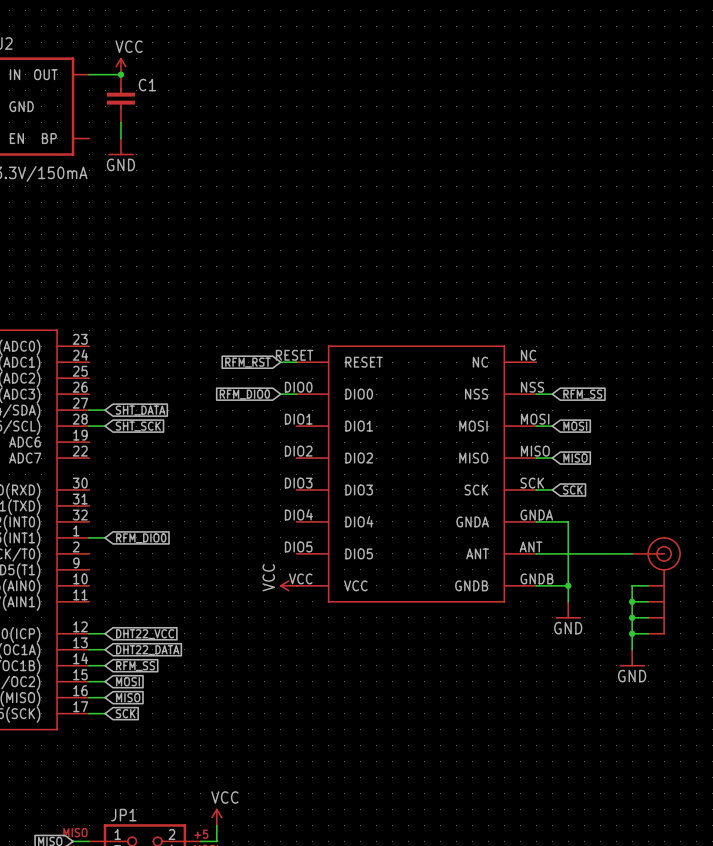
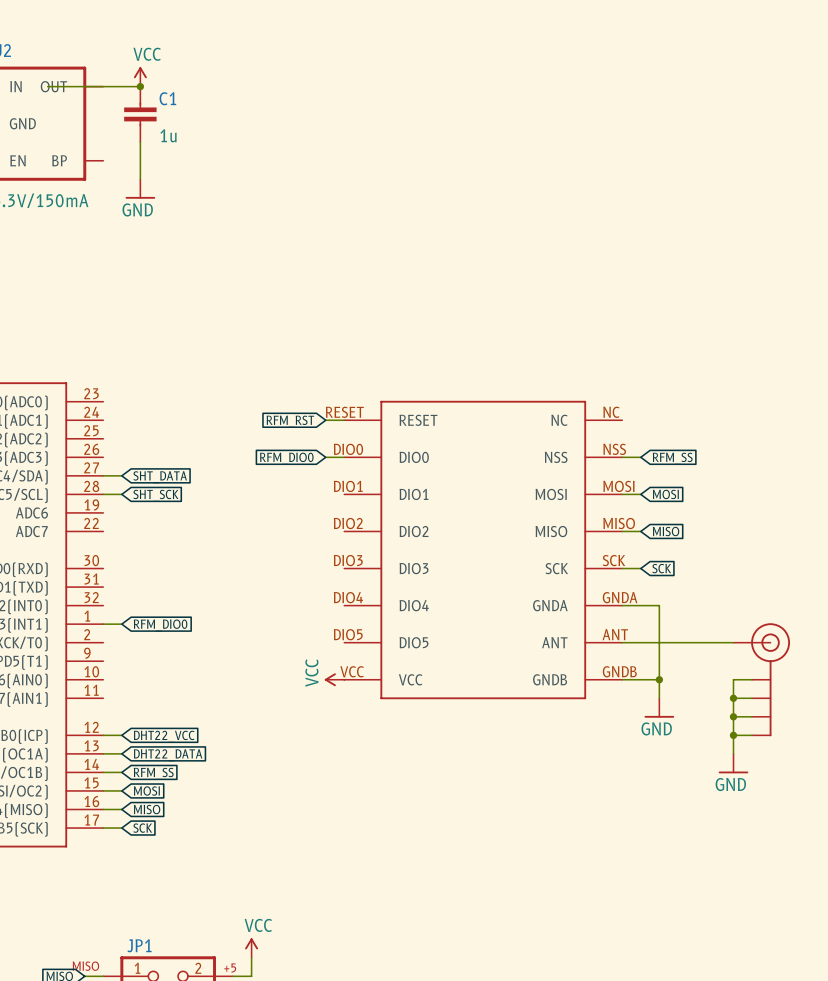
wire: none -> (47, 86) (103, 86)
C1 value: none -> 1u (168, 135)
power symbol position: GND (120, 146) -> GND (140, 189)

